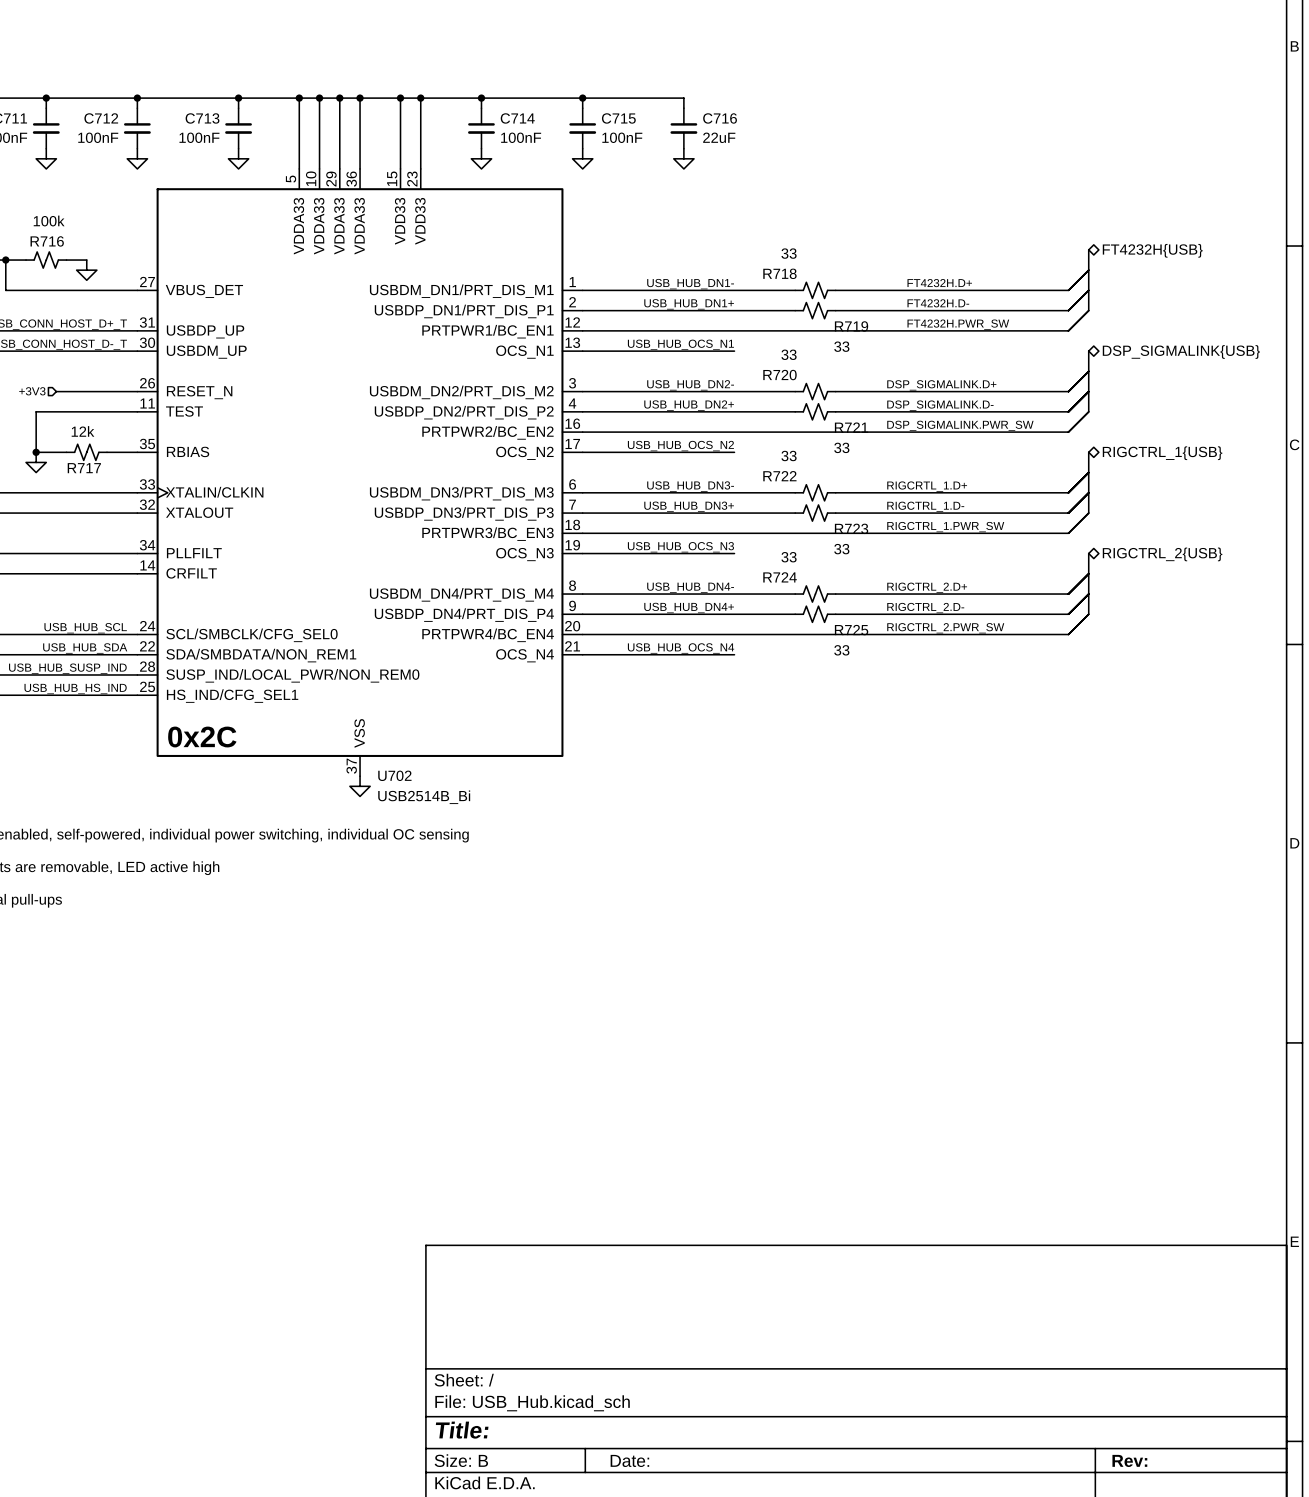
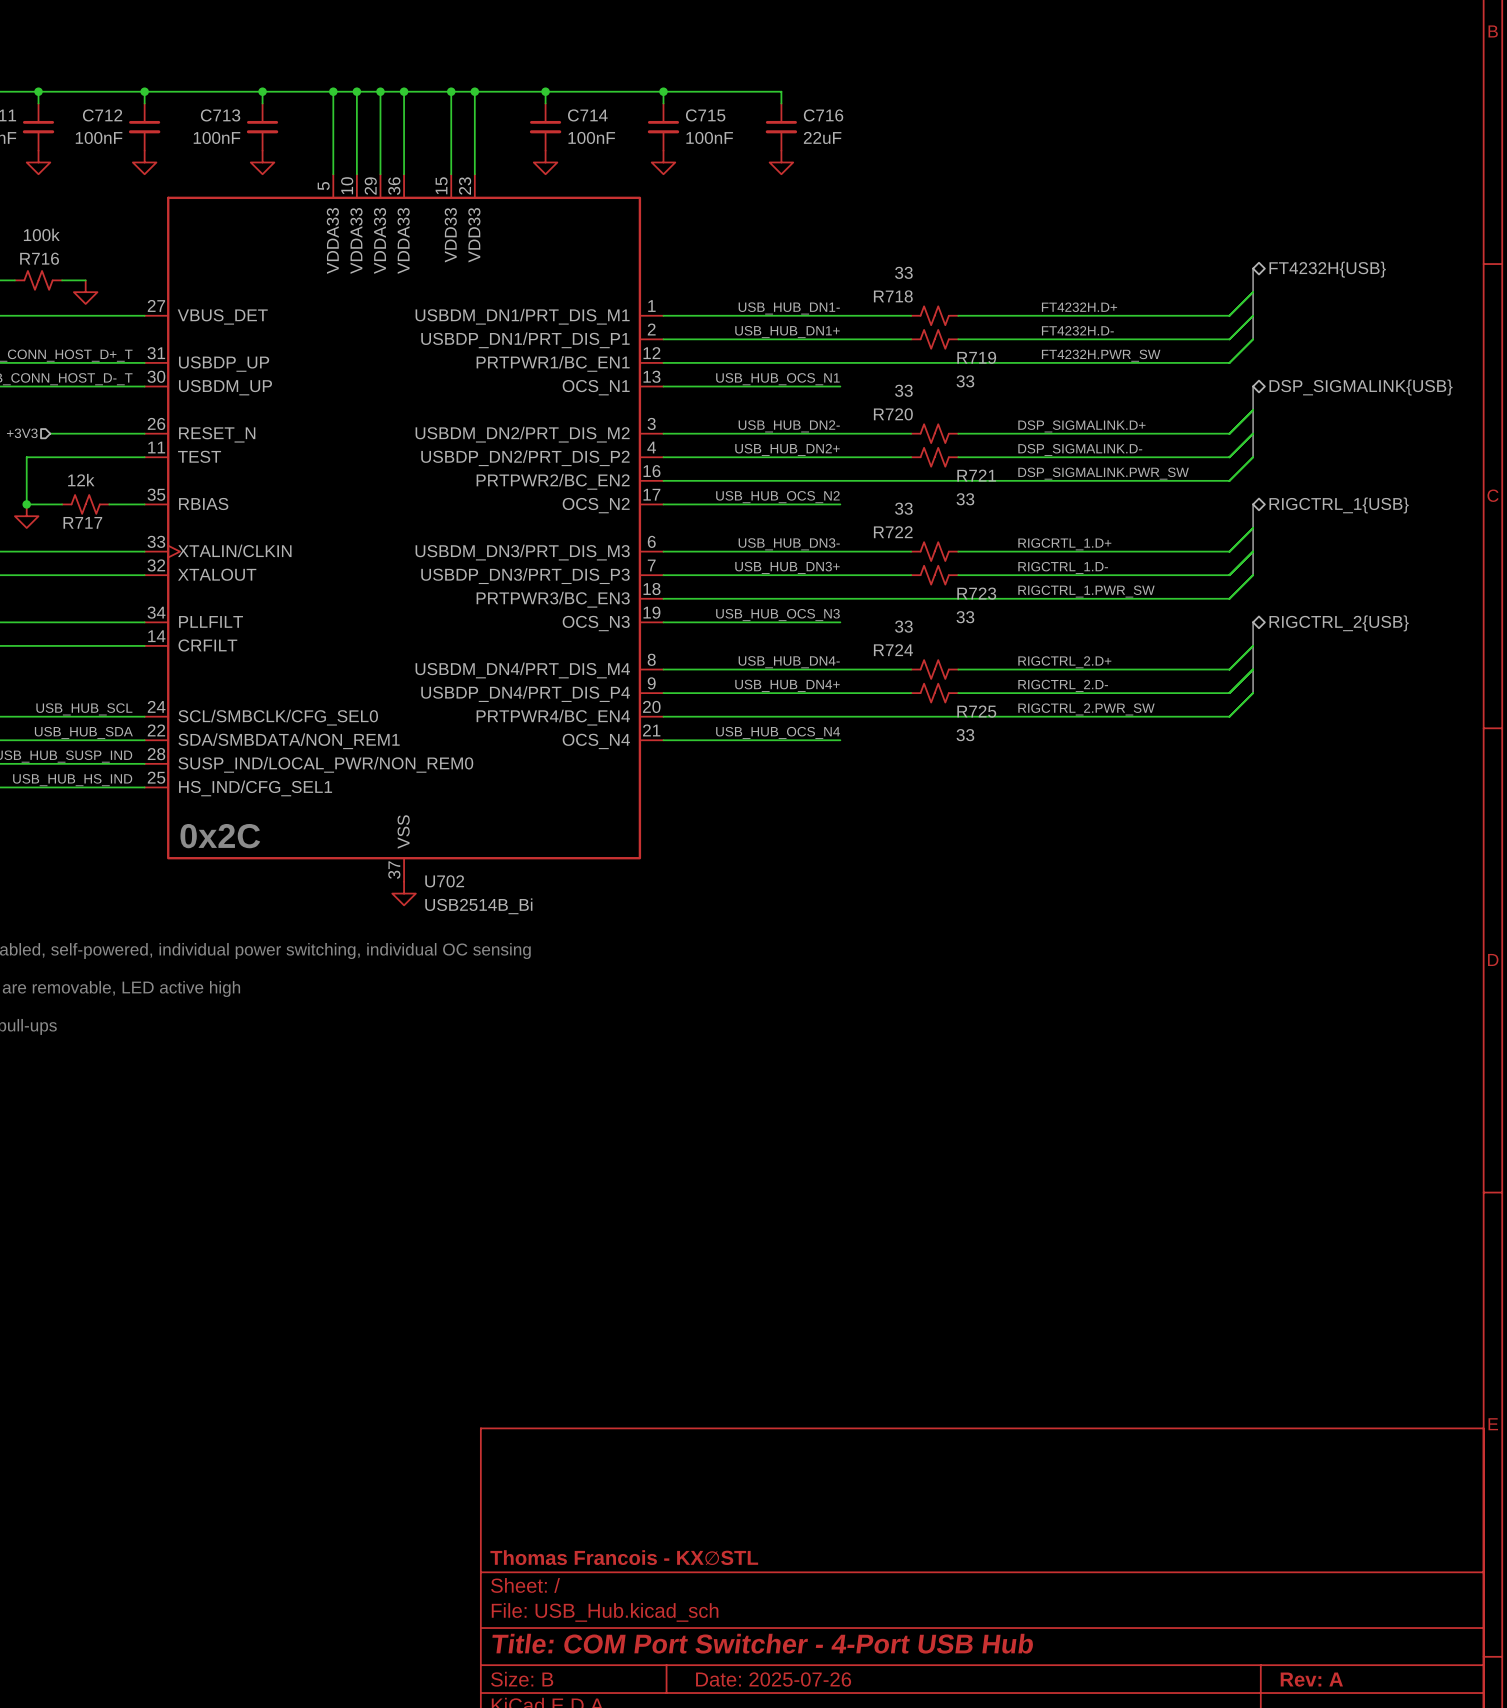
title block: none -> Thomas Francois - KX∅STL (624, 1557)
title block: Title: (462, 1430) -> Title: COM Port Switcher - 4-Port USB Hub (762, 1643)
title block: Date: (629, 1460) -> Date: 2025-07-26 (773, 1679)
title block: Rev: (1129, 1460) -> Rev: A (1311, 1679)

